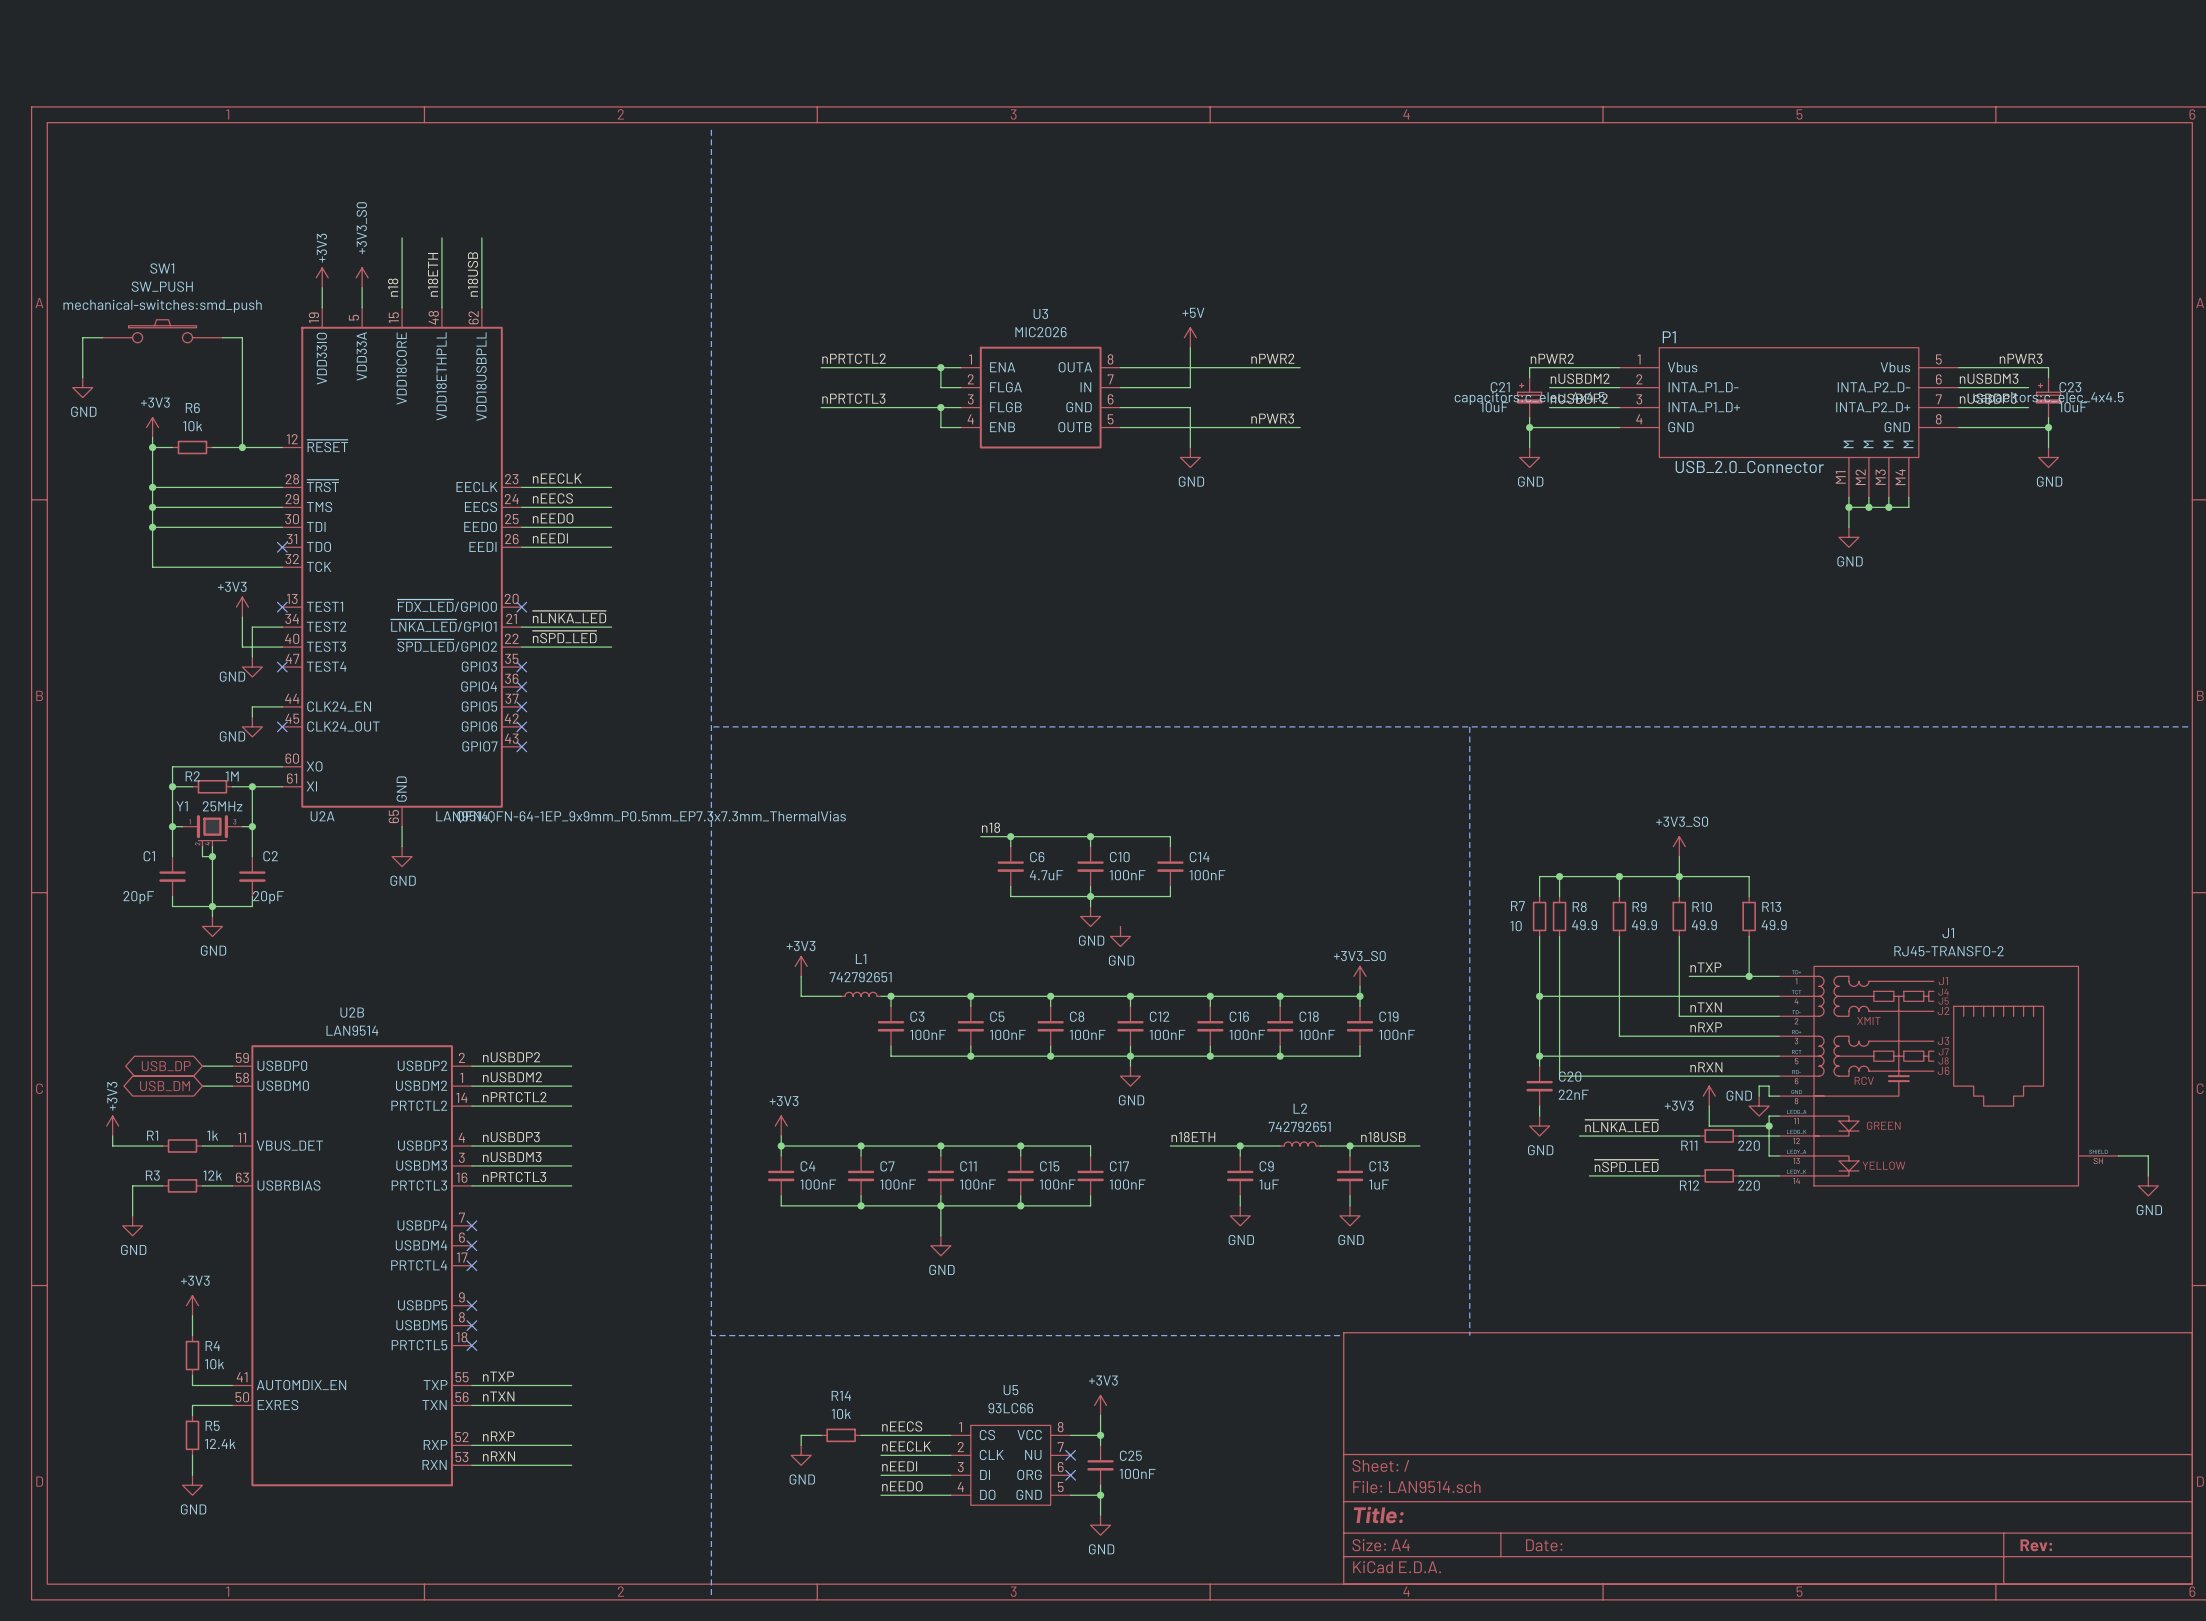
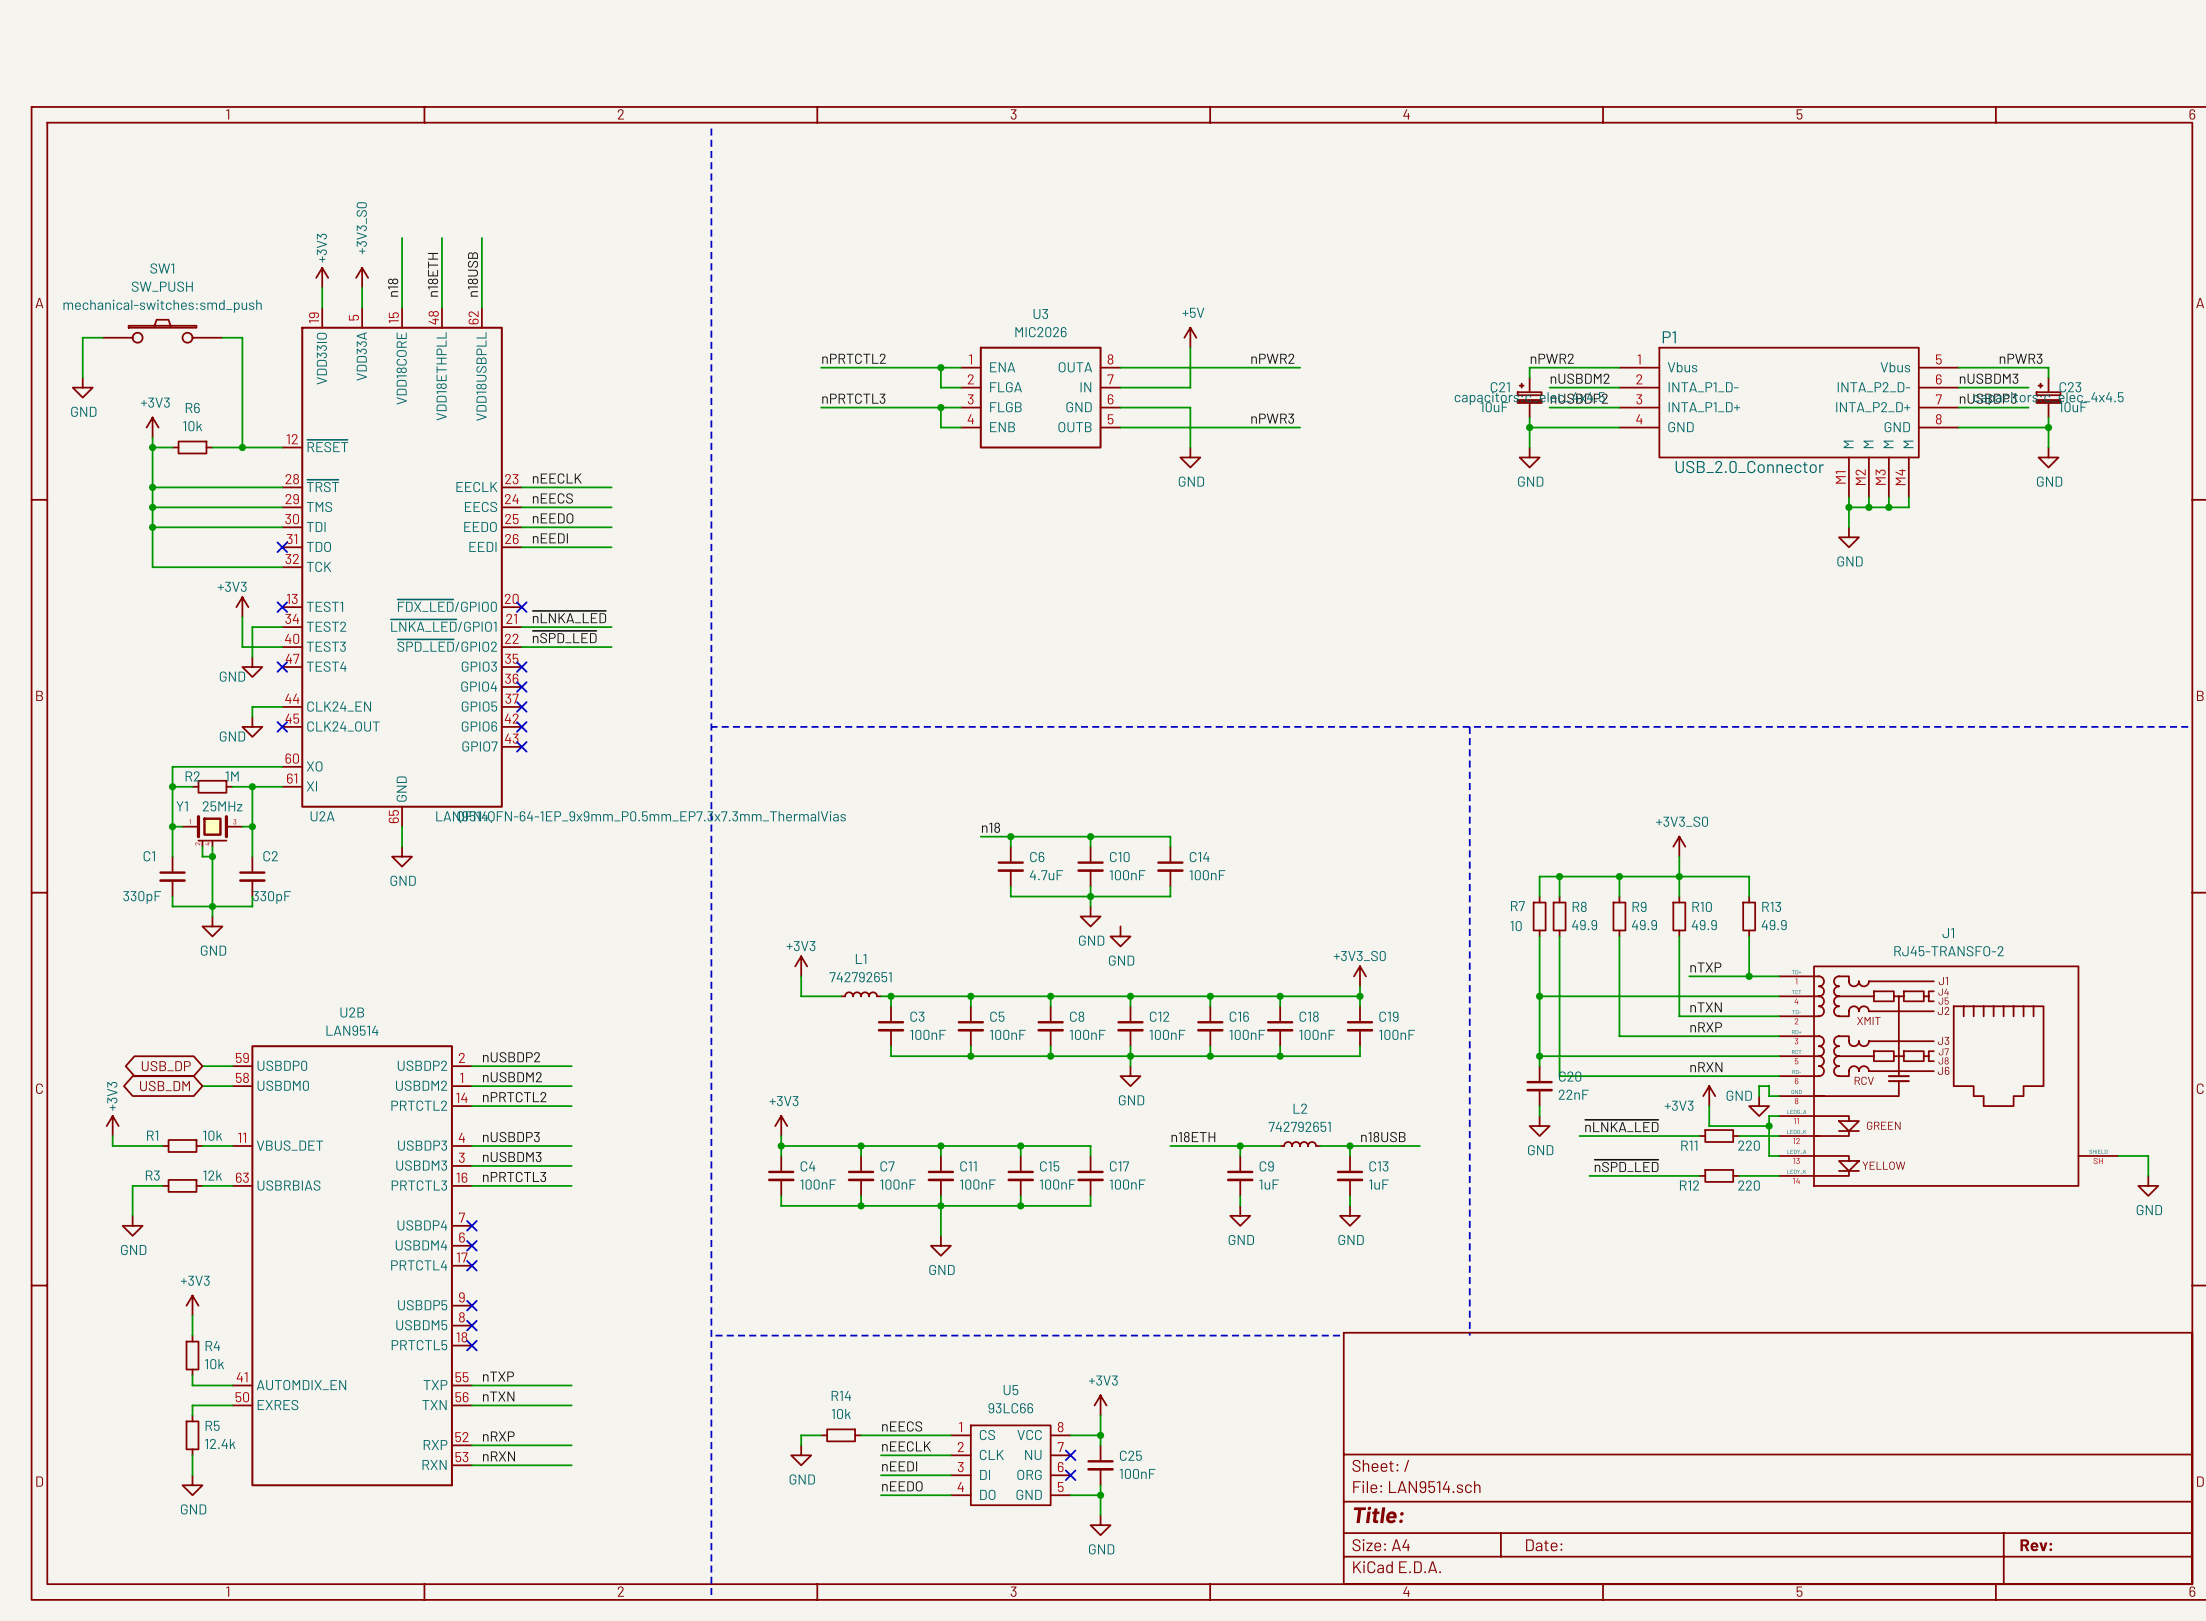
C1 value: 20pF (138, 897) -> 330pF (142, 897)
C2 value: 20pF (268, 897) -> 330pF (271, 897)
R1 value: 1k (212, 1135) -> 10k (212, 1135)

